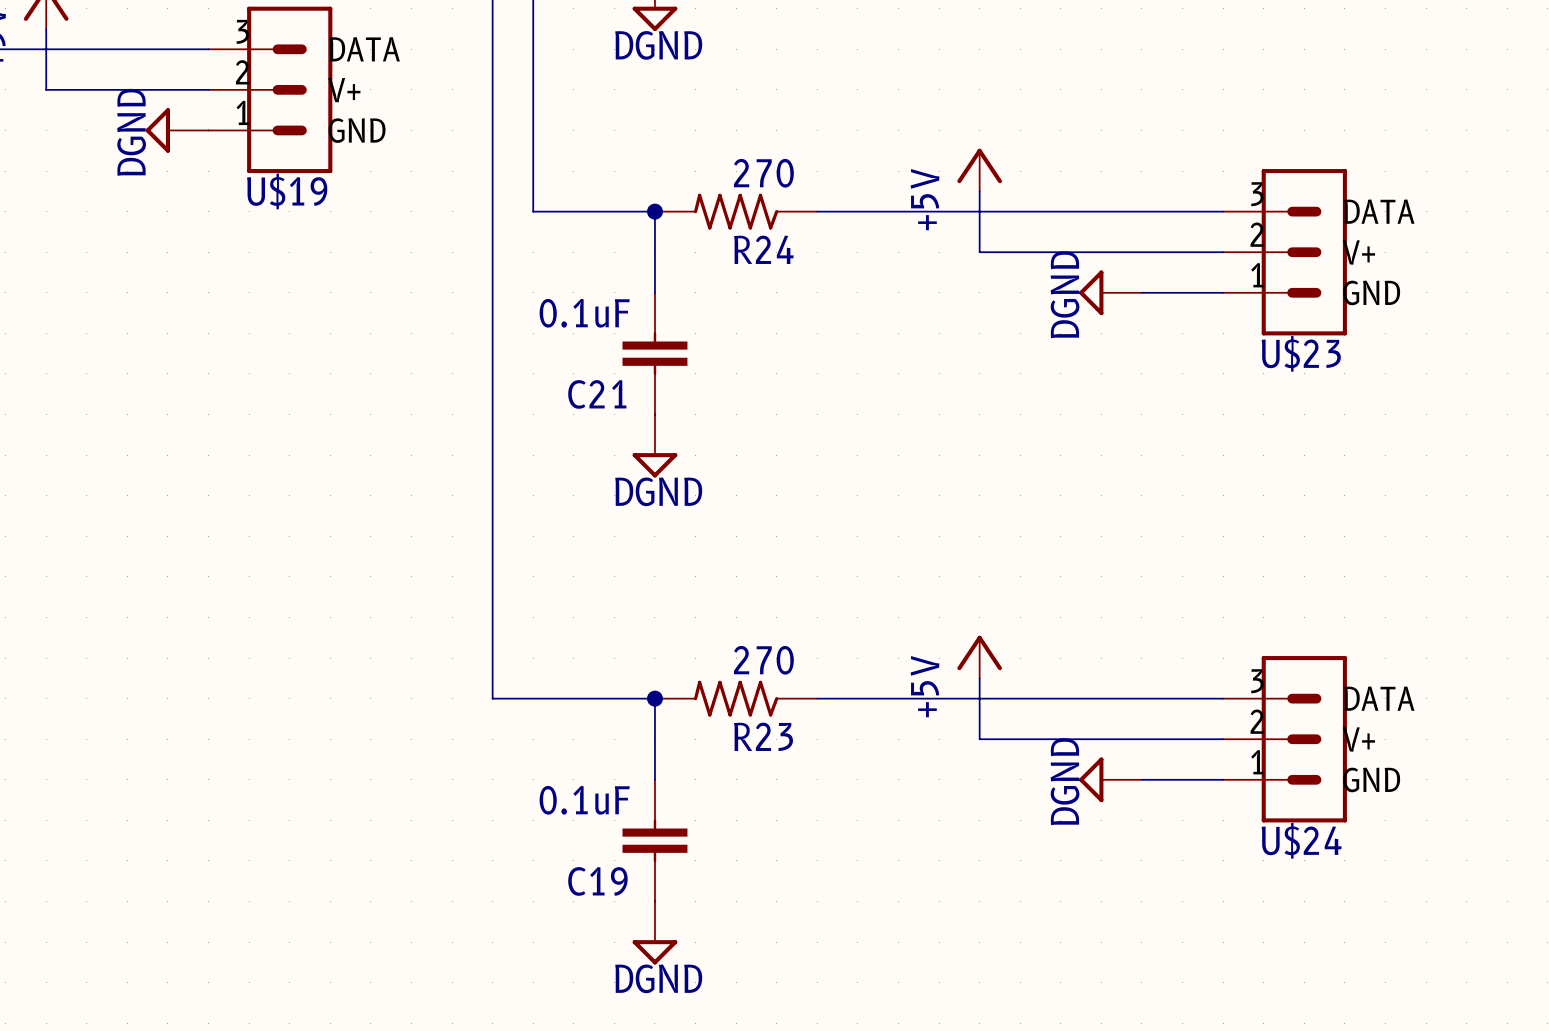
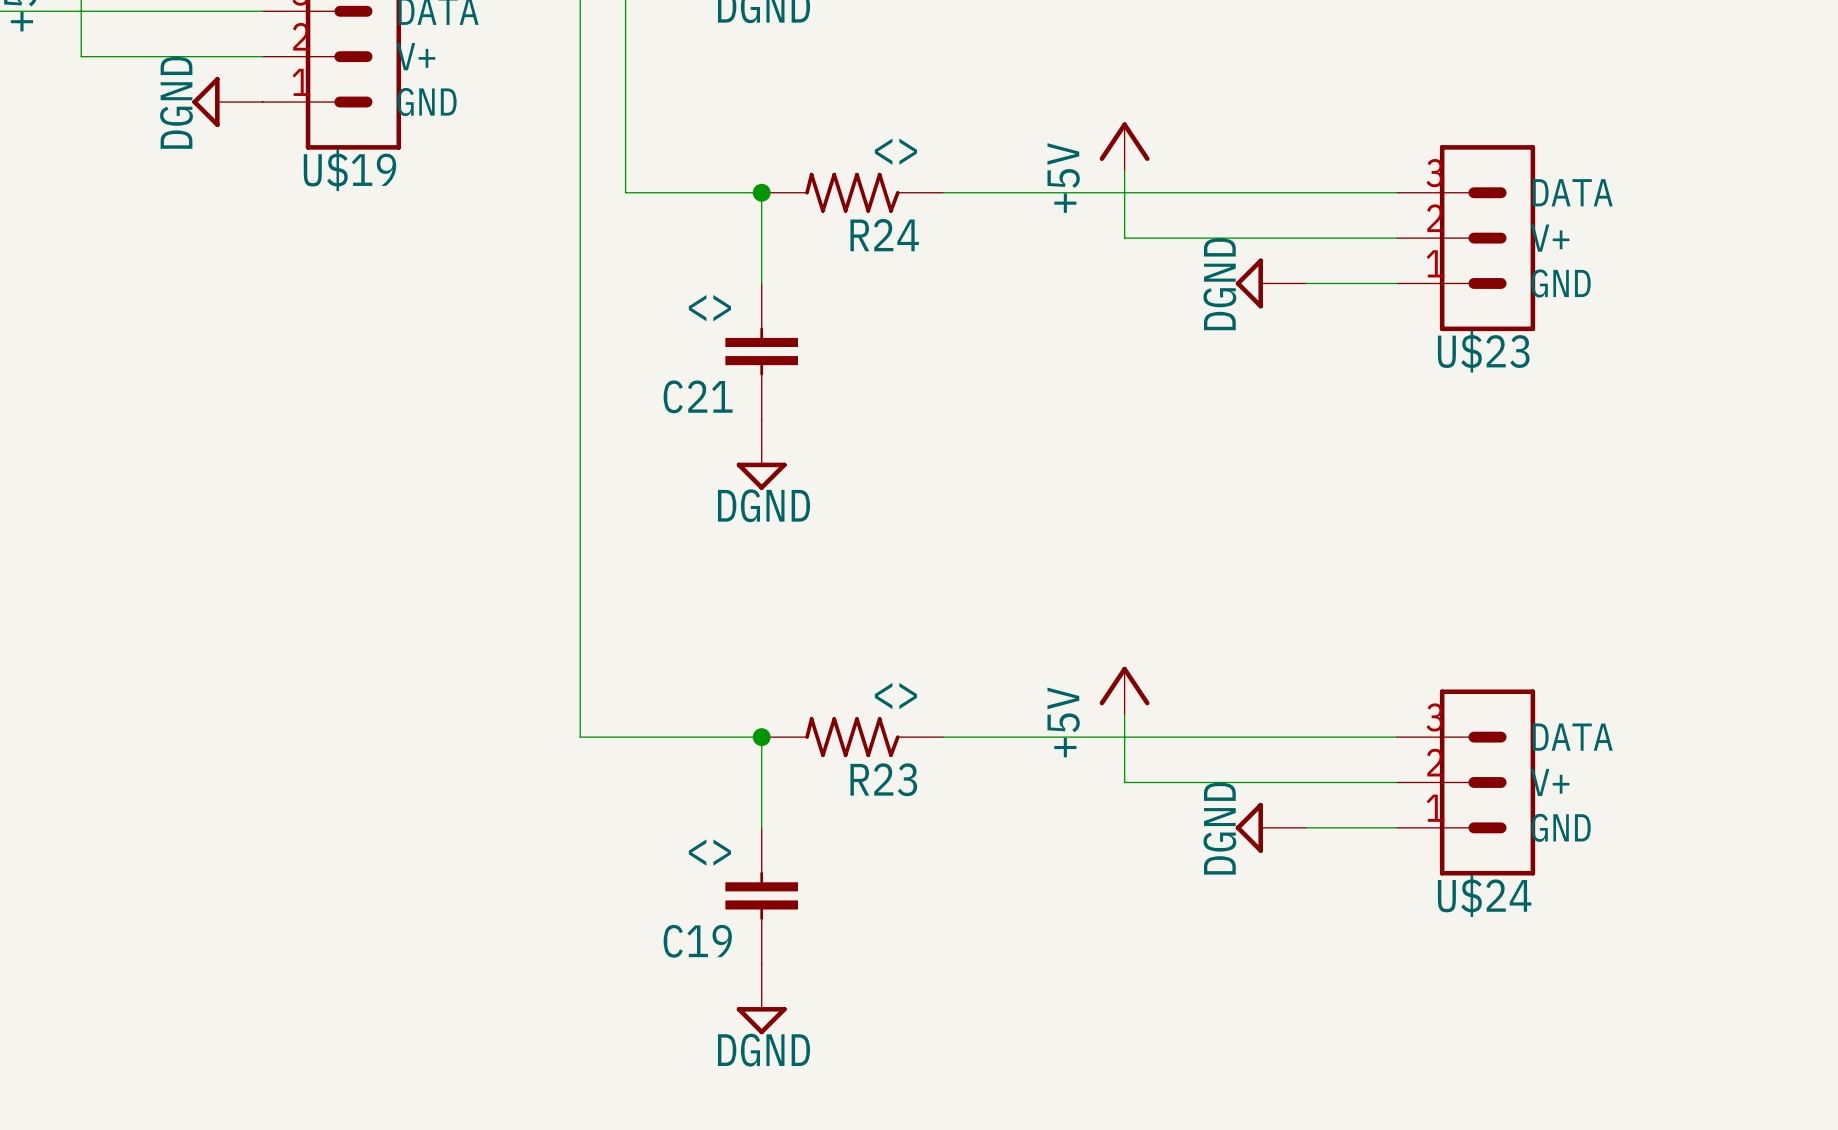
R24 value: 270 (763, 173) -> <> (895, 151)
C21 value: 0.1uF (584, 313) -> <> (709, 308)
R23 value: 270 (763, 660) -> <> (895, 696)
C19 value: 0.1uF (584, 800) -> <> (709, 852)

